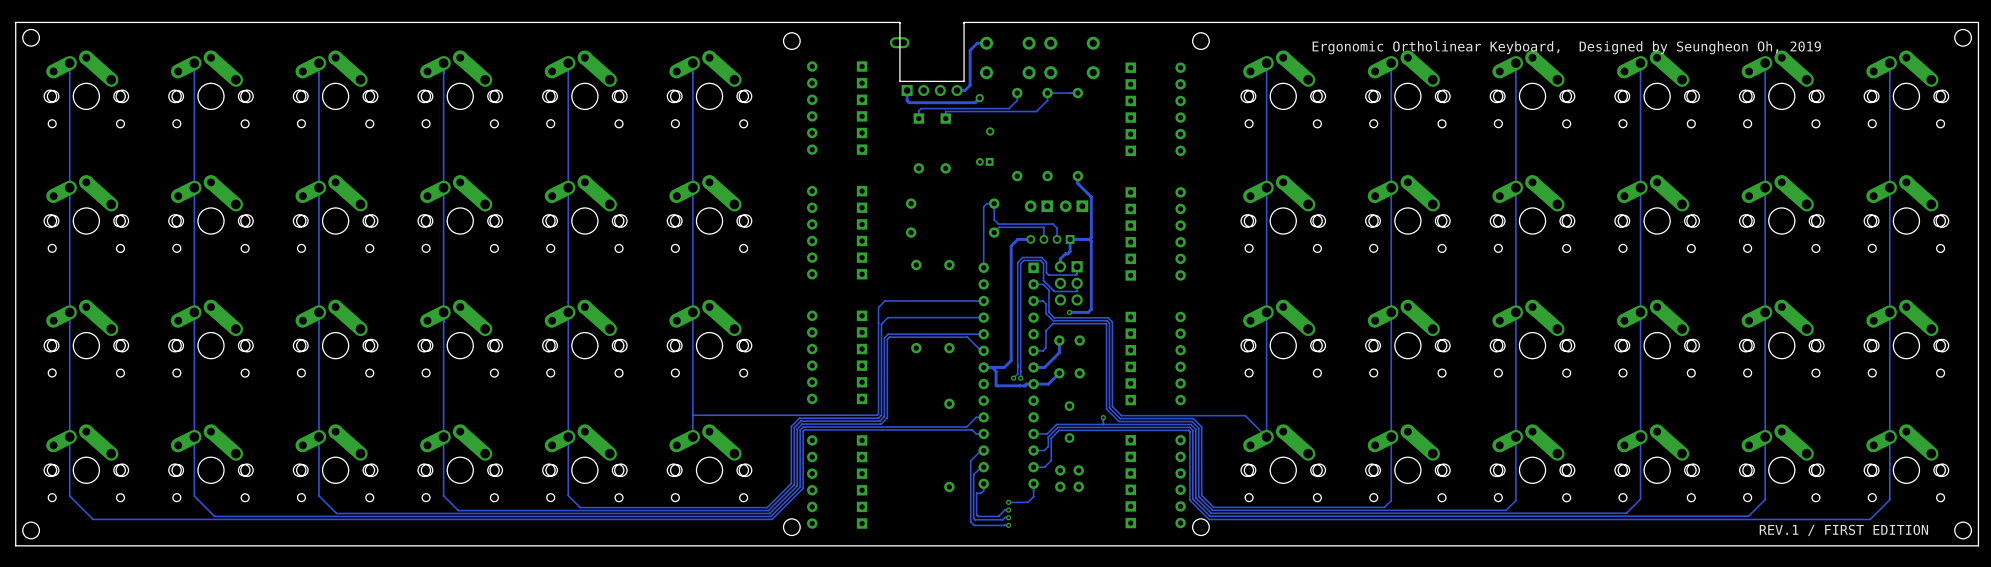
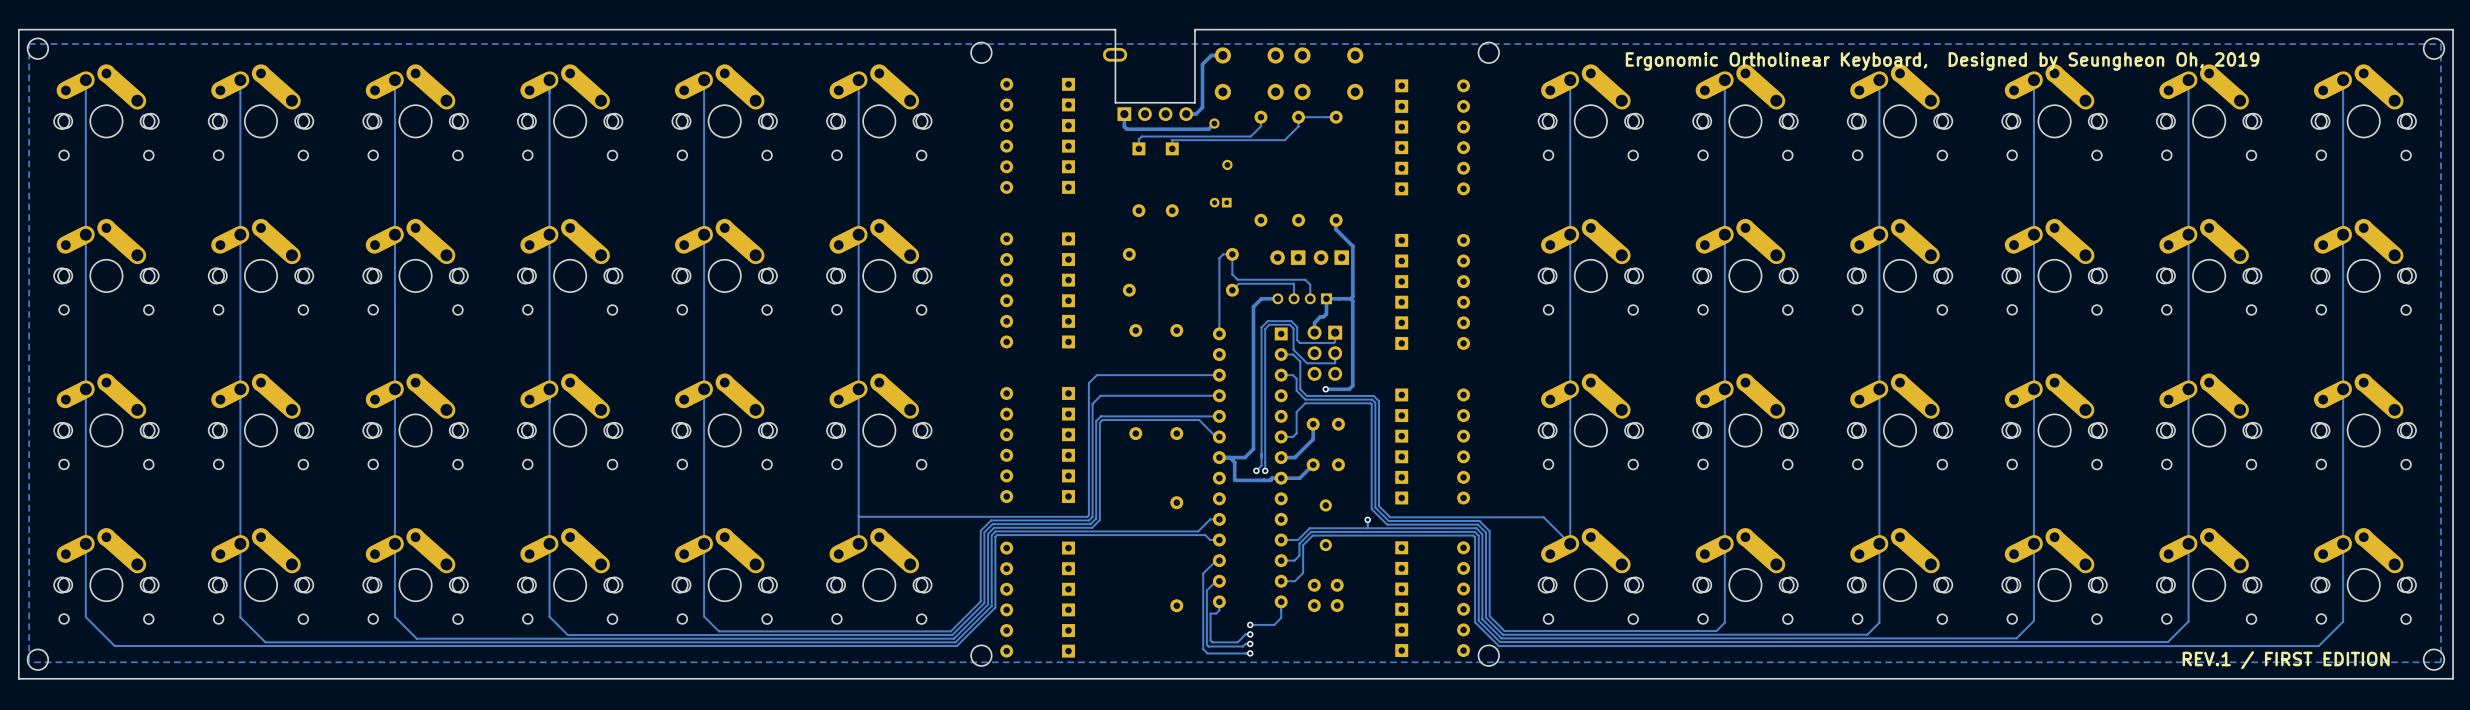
zone outline: none -> (29, 44) (29, 662) (2440, 662) (2440, 44) (29, 44)

